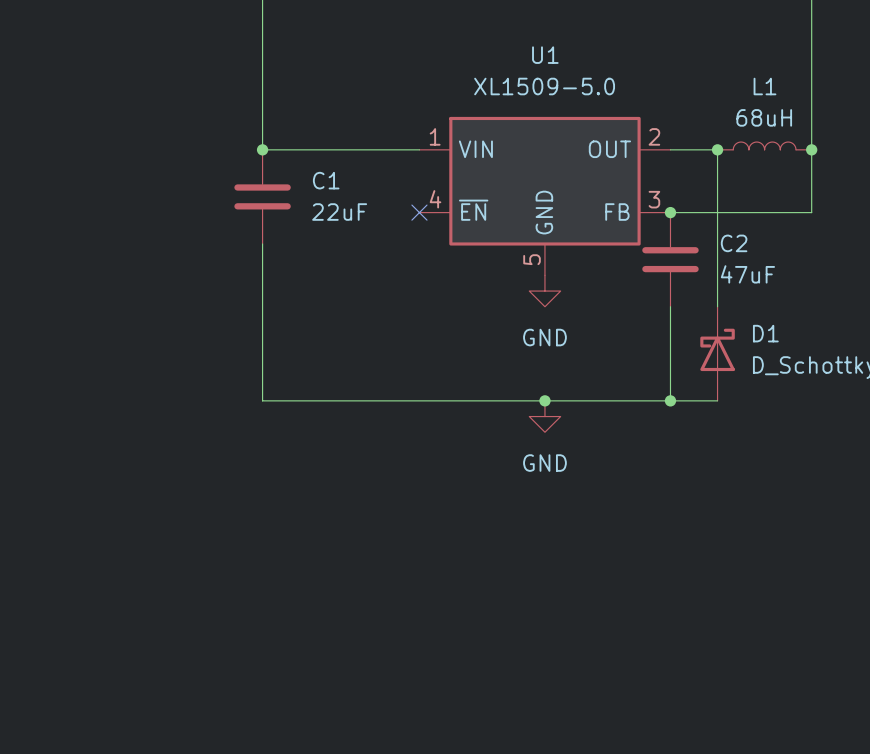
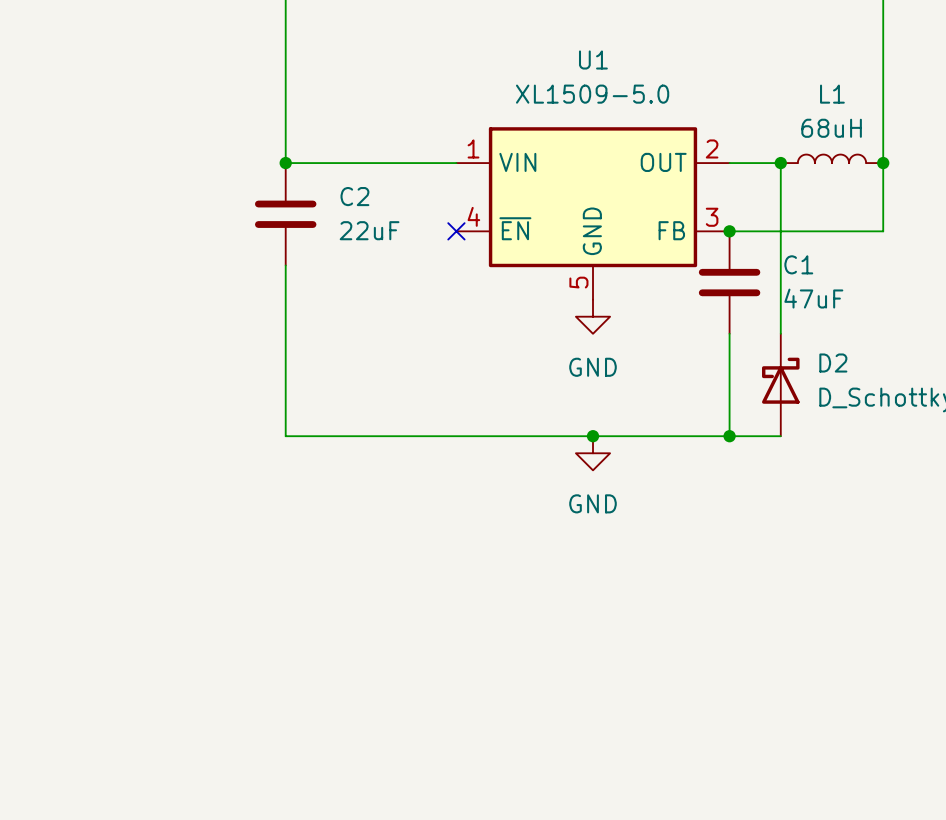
C1 name: C1 (326, 180) -> C2 (354, 196)
C2 name: C2 (734, 243) -> C1 (798, 264)
D1 name: D1 (765, 333) -> D2 (833, 363)

